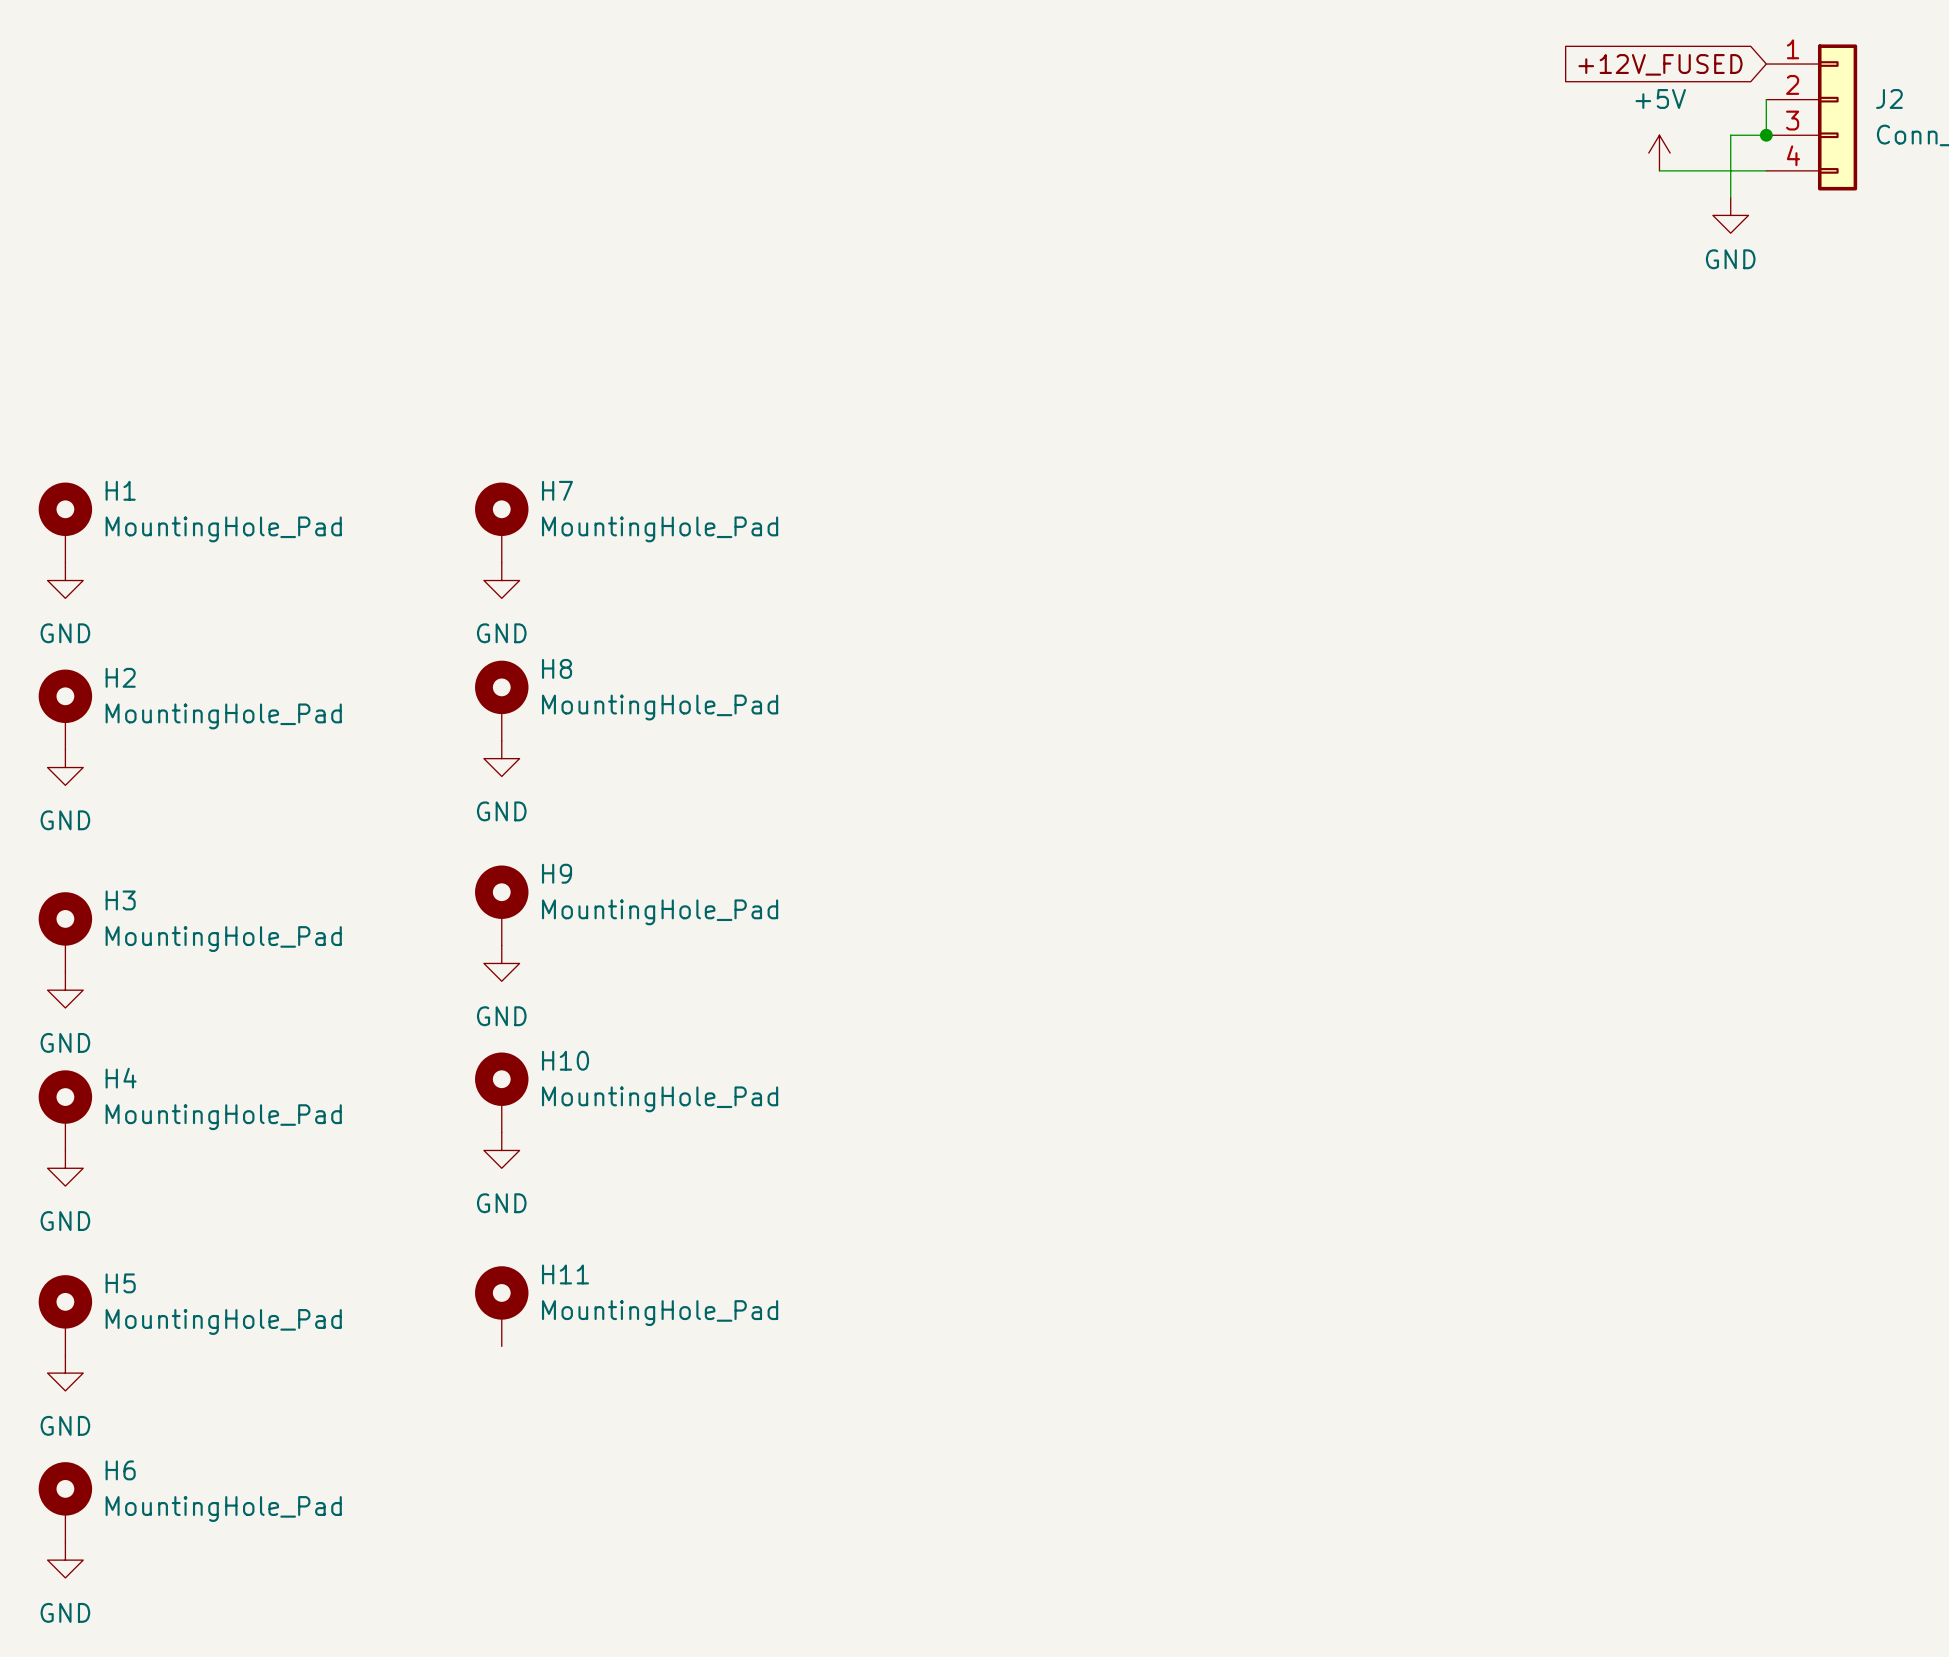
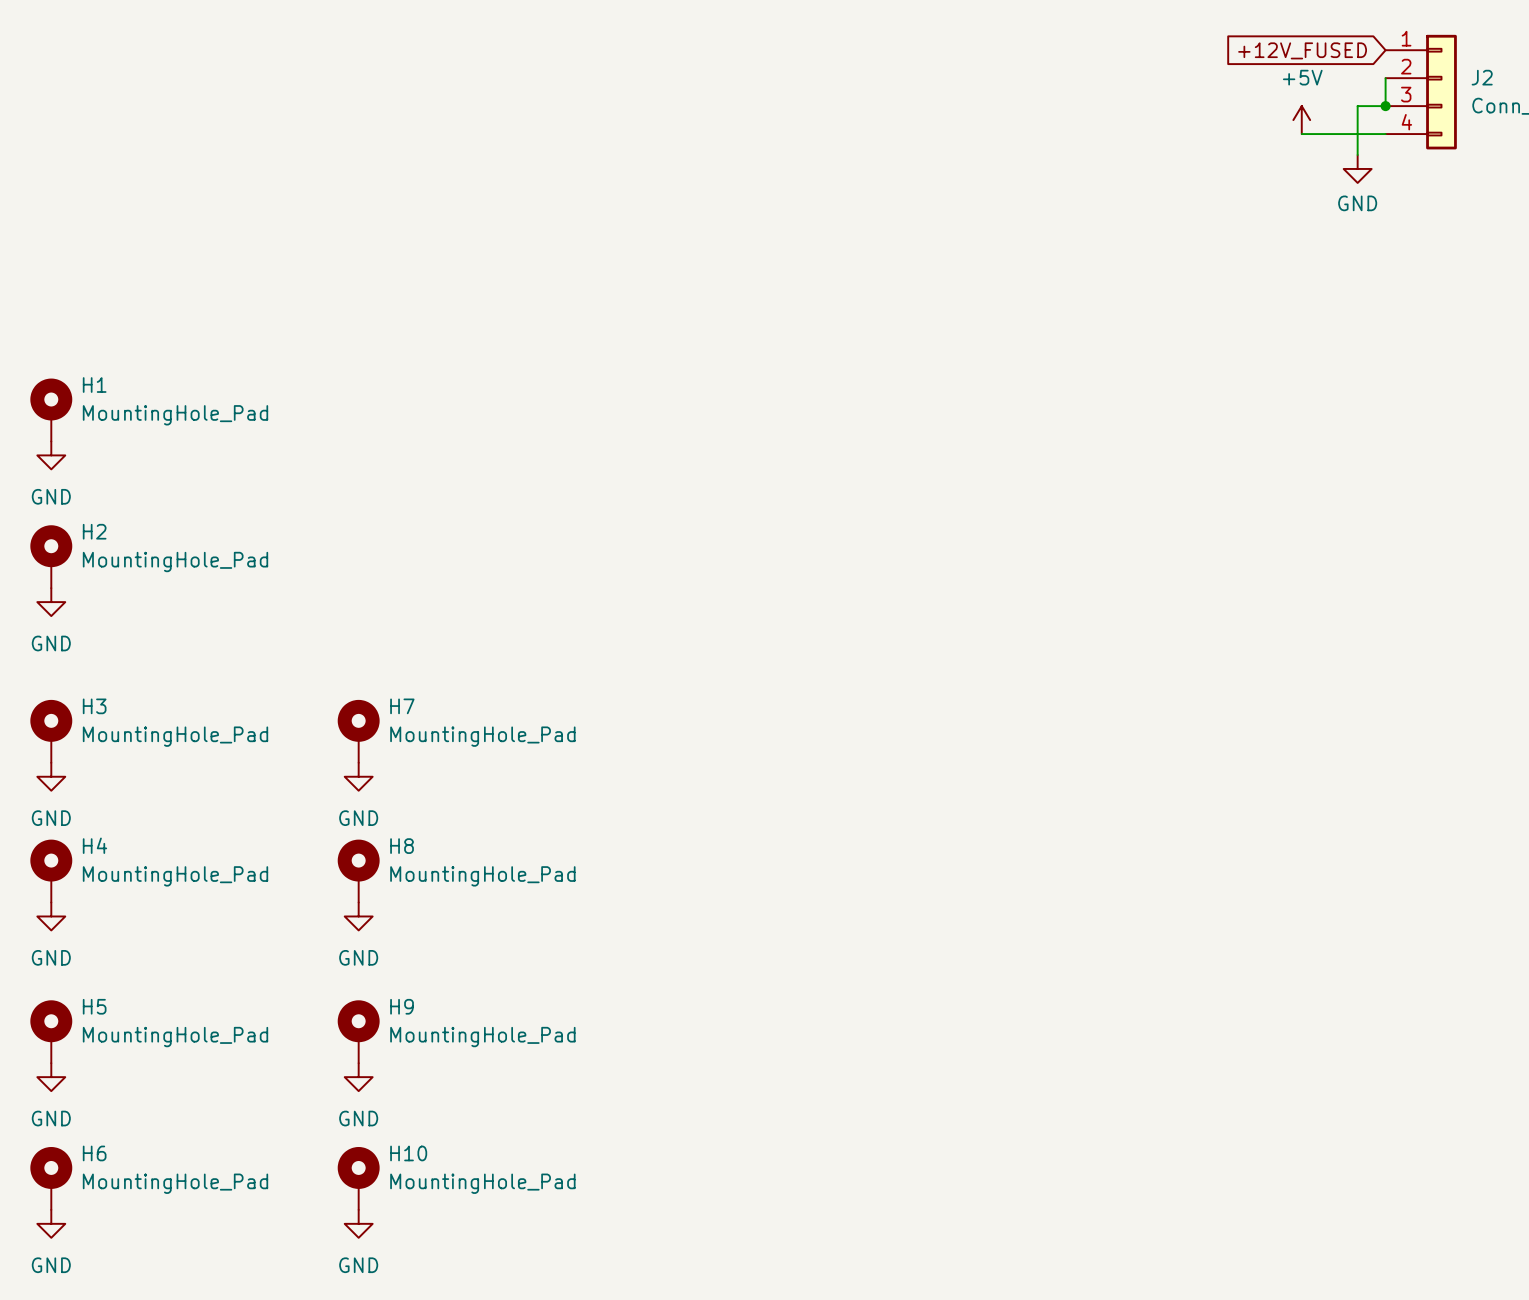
H7 position: (501, 522) -> (358, 731)
power symbol: GND (501, 580) -> none
H8 position: (501, 700) -> (358, 871)
power symbol: GND (501, 758) -> none
H9 position: (501, 905) -> (358, 1031)
power symbol position: GND (501, 963) -> GND (358, 776)
H10 position: (501, 1092) -> (358, 1178)
power symbol position: GND (501, 1150) -> GND (358, 916)
H11: MountingHole_Pad (501, 1306) -> none
power symbol: none -> GND (358, 1077)
power symbol: none -> GND (358, 1223)

